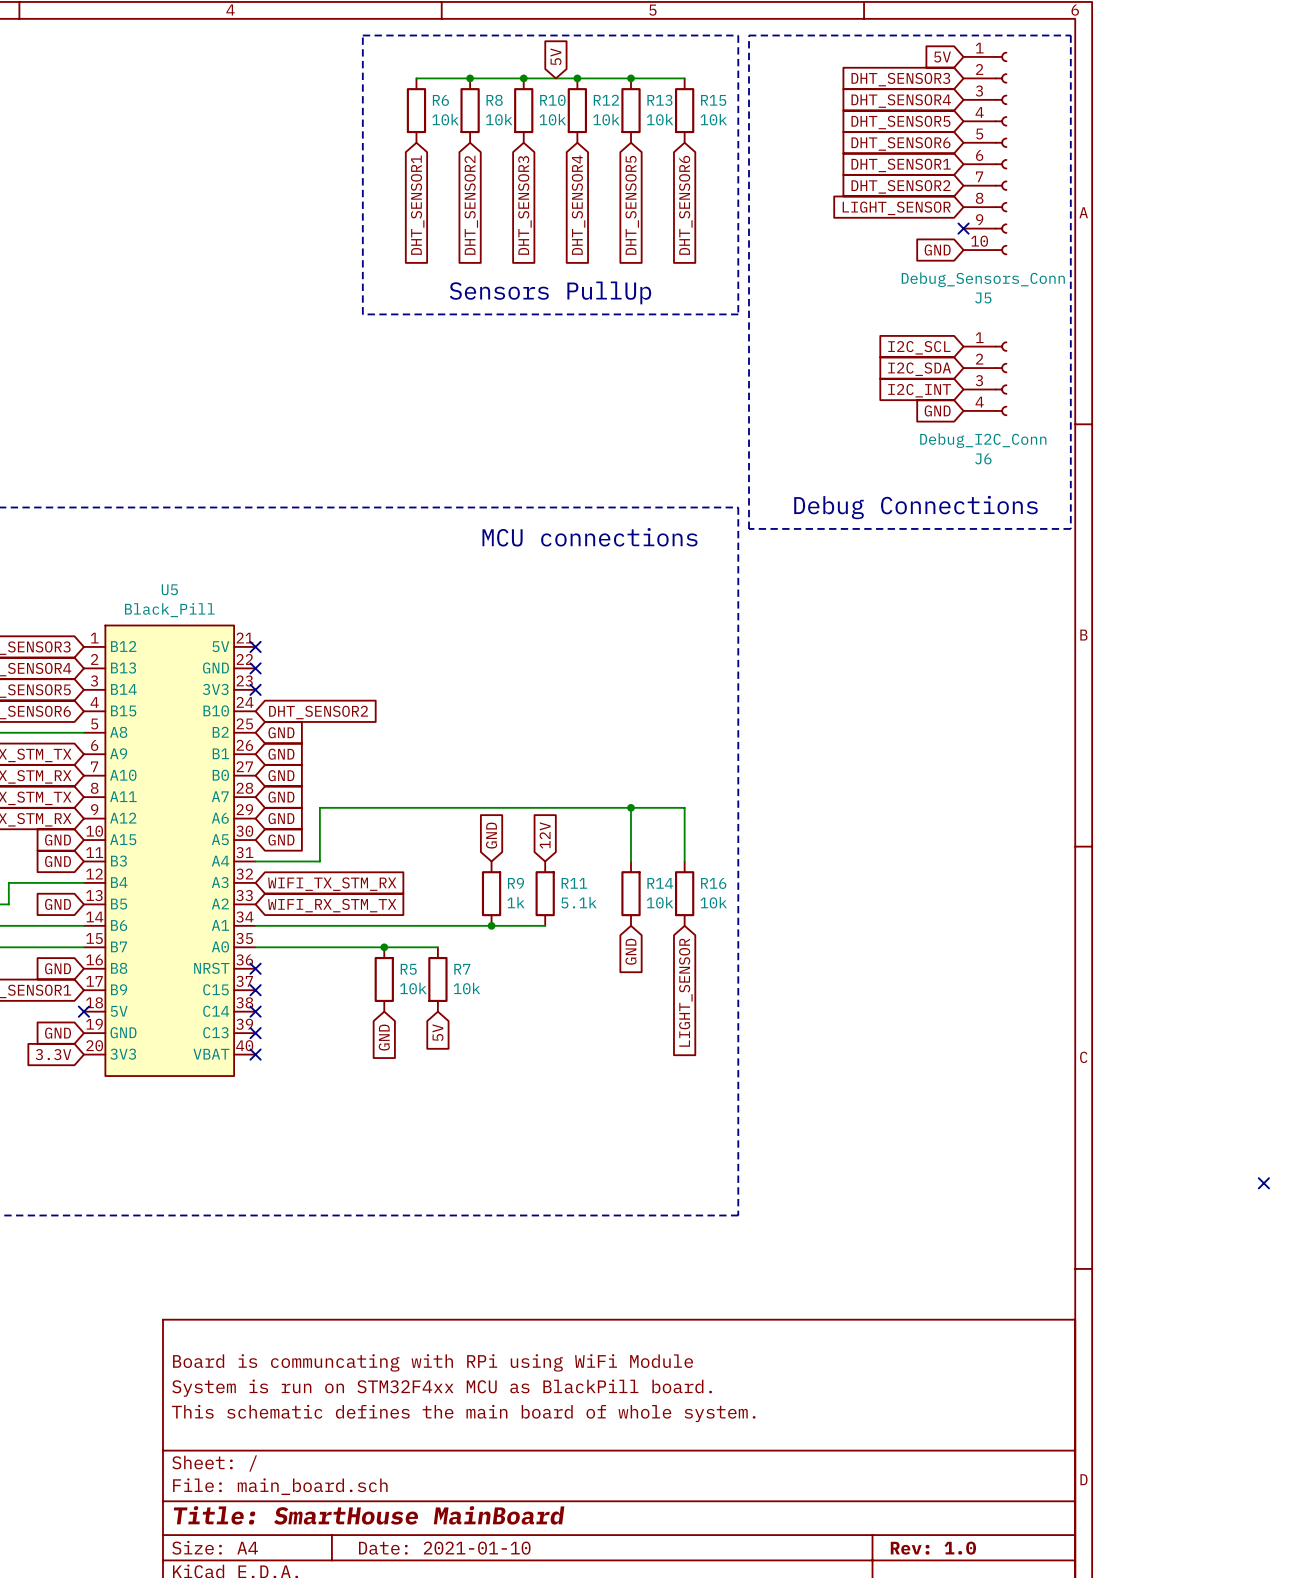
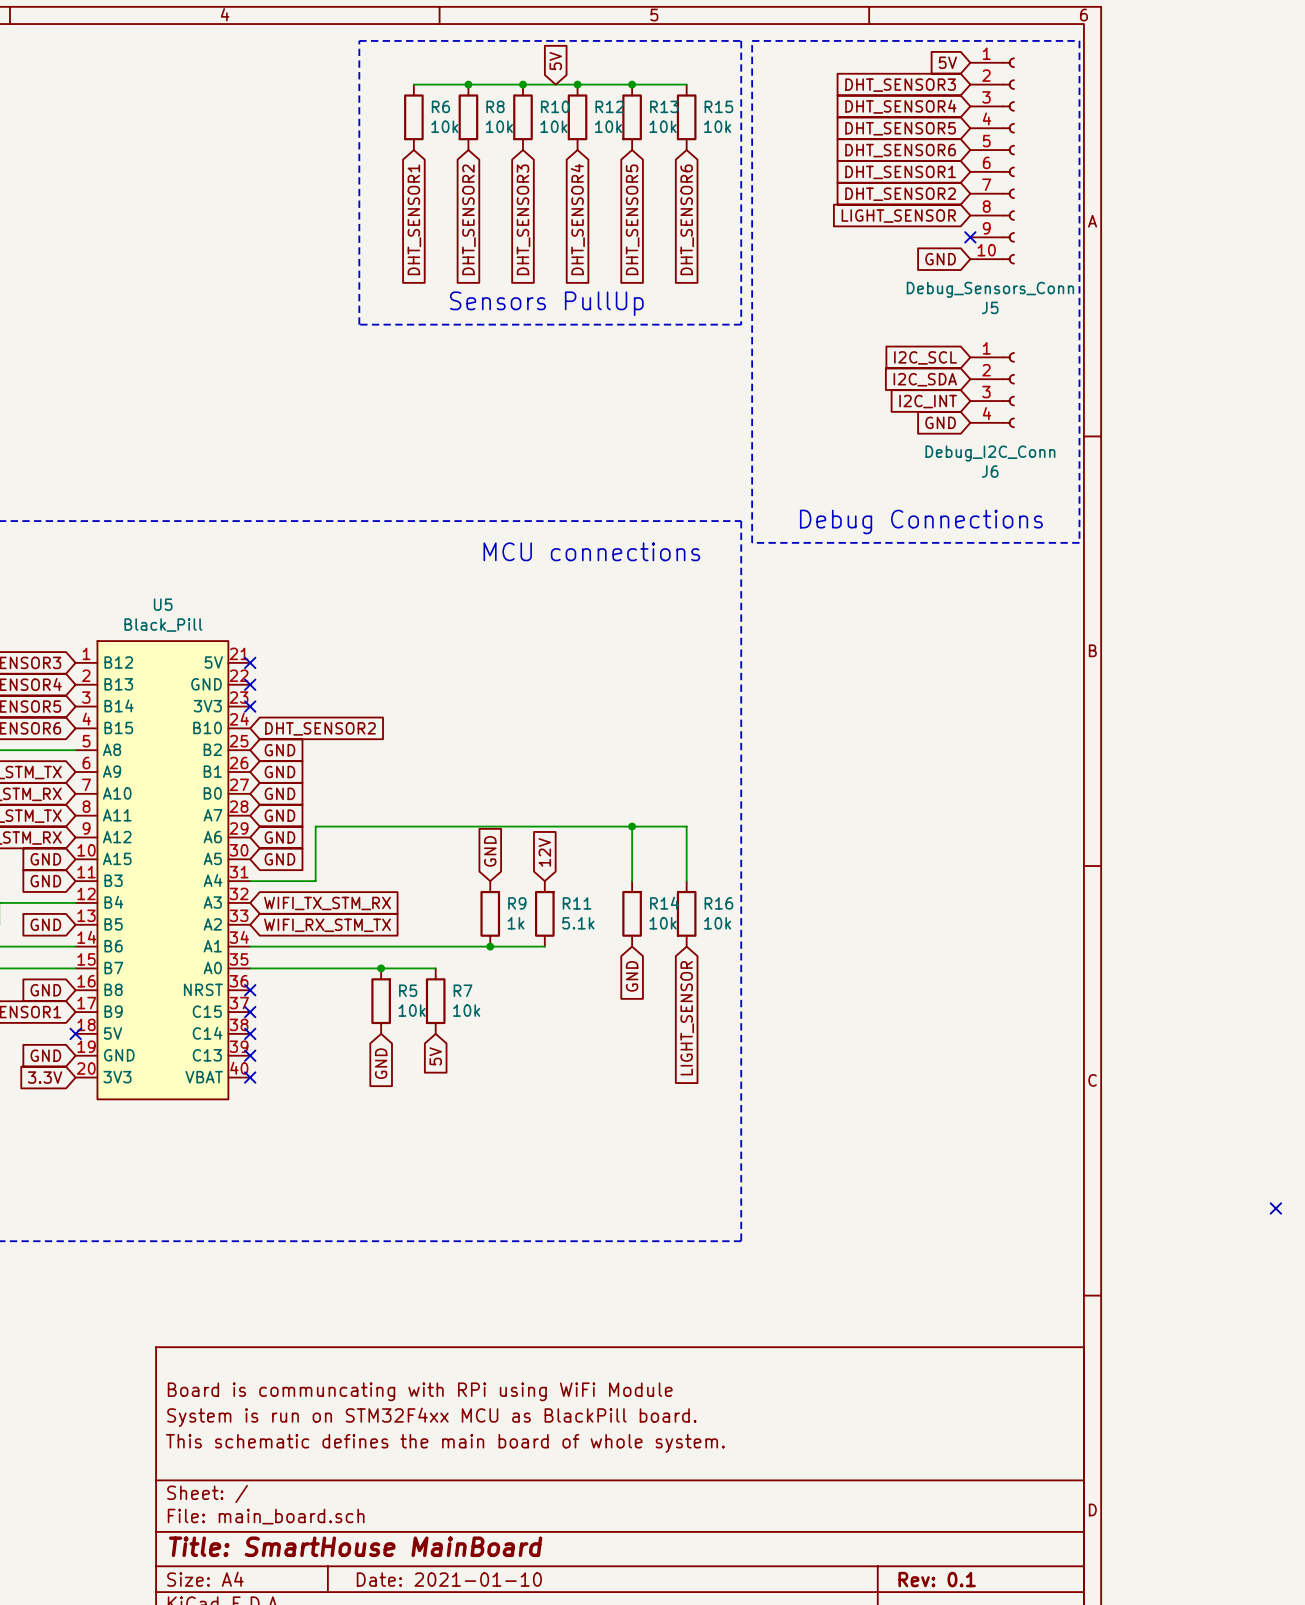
title block: Rev: 1.0 (933, 1548) -> Rev: 0.1 (937, 1579)

